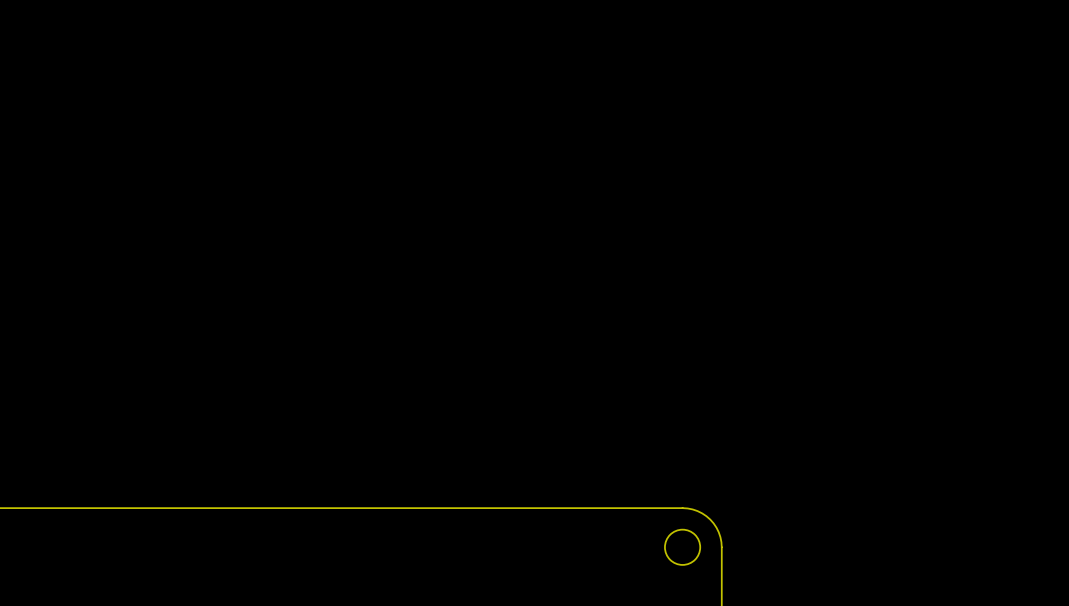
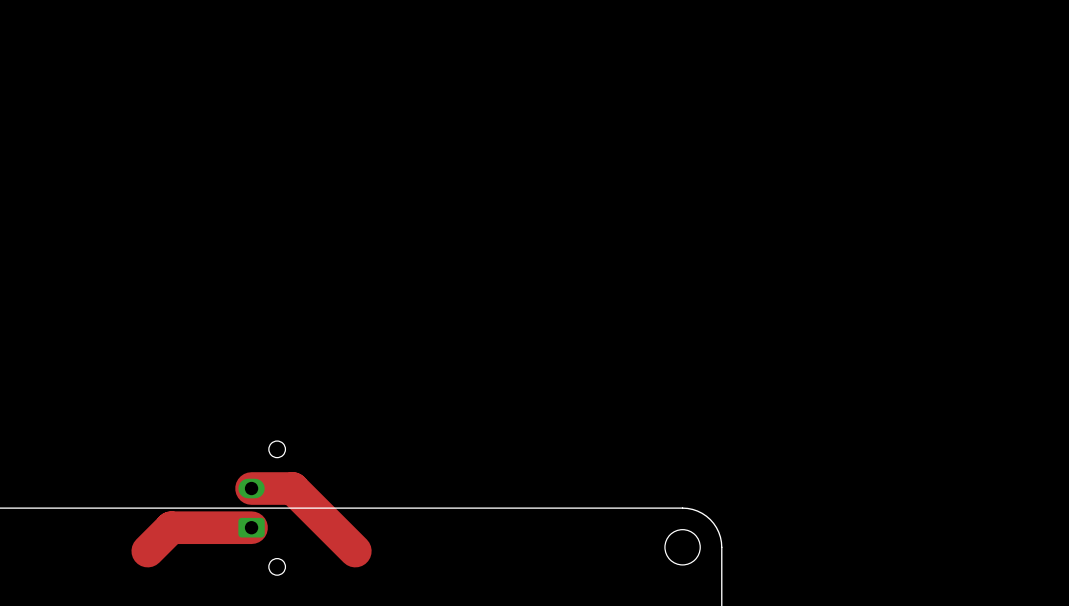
top track: none -> (251, 488) (292, 488) (355, 551)
part: none -> (261, 508)
top track: none -> (251, 527) (171, 527) (147, 551)

